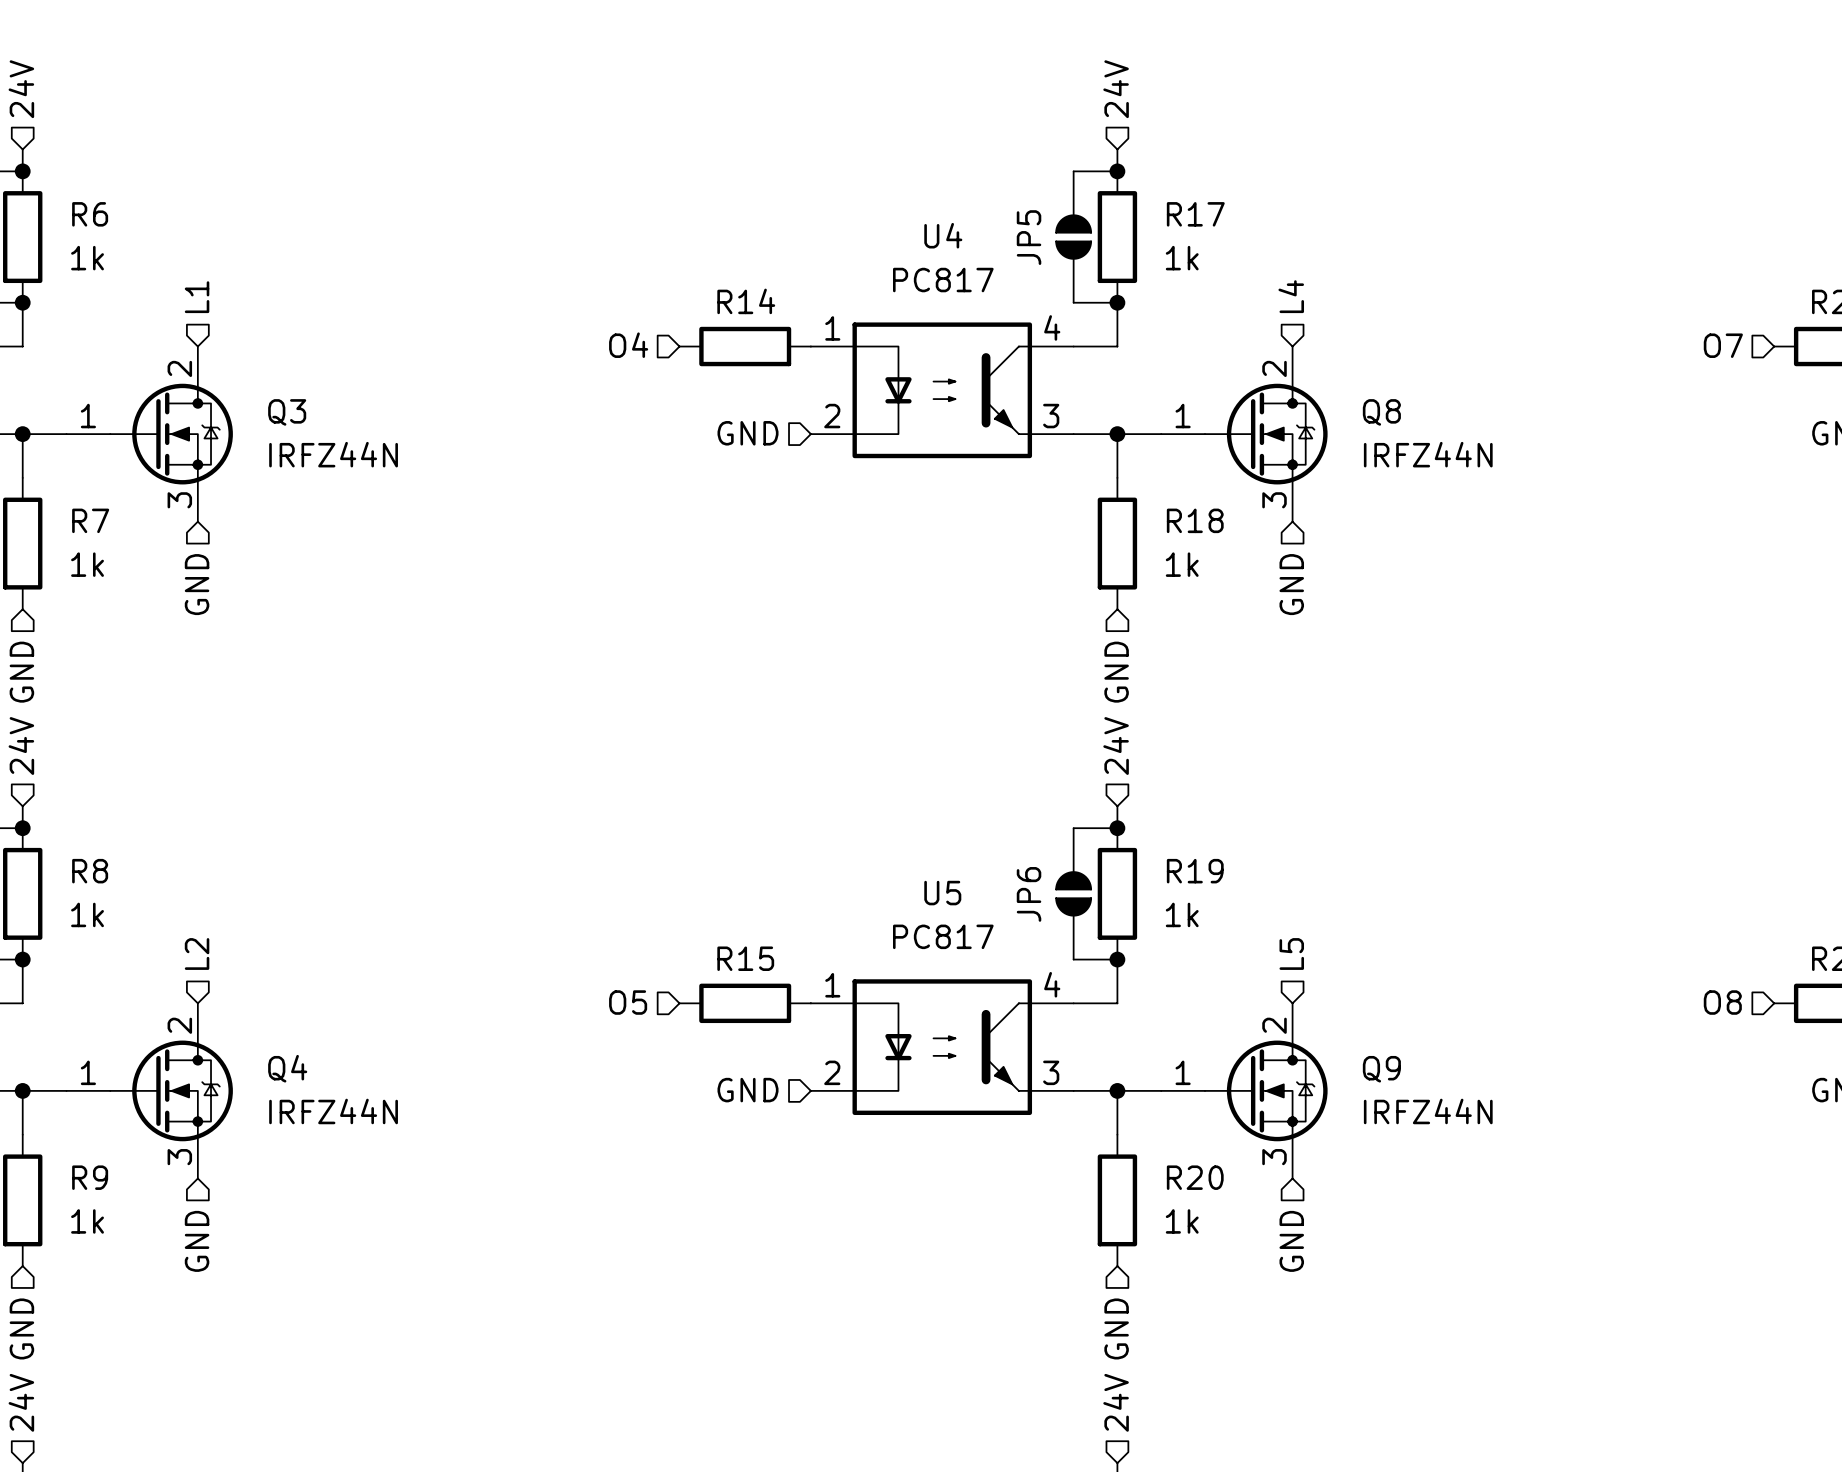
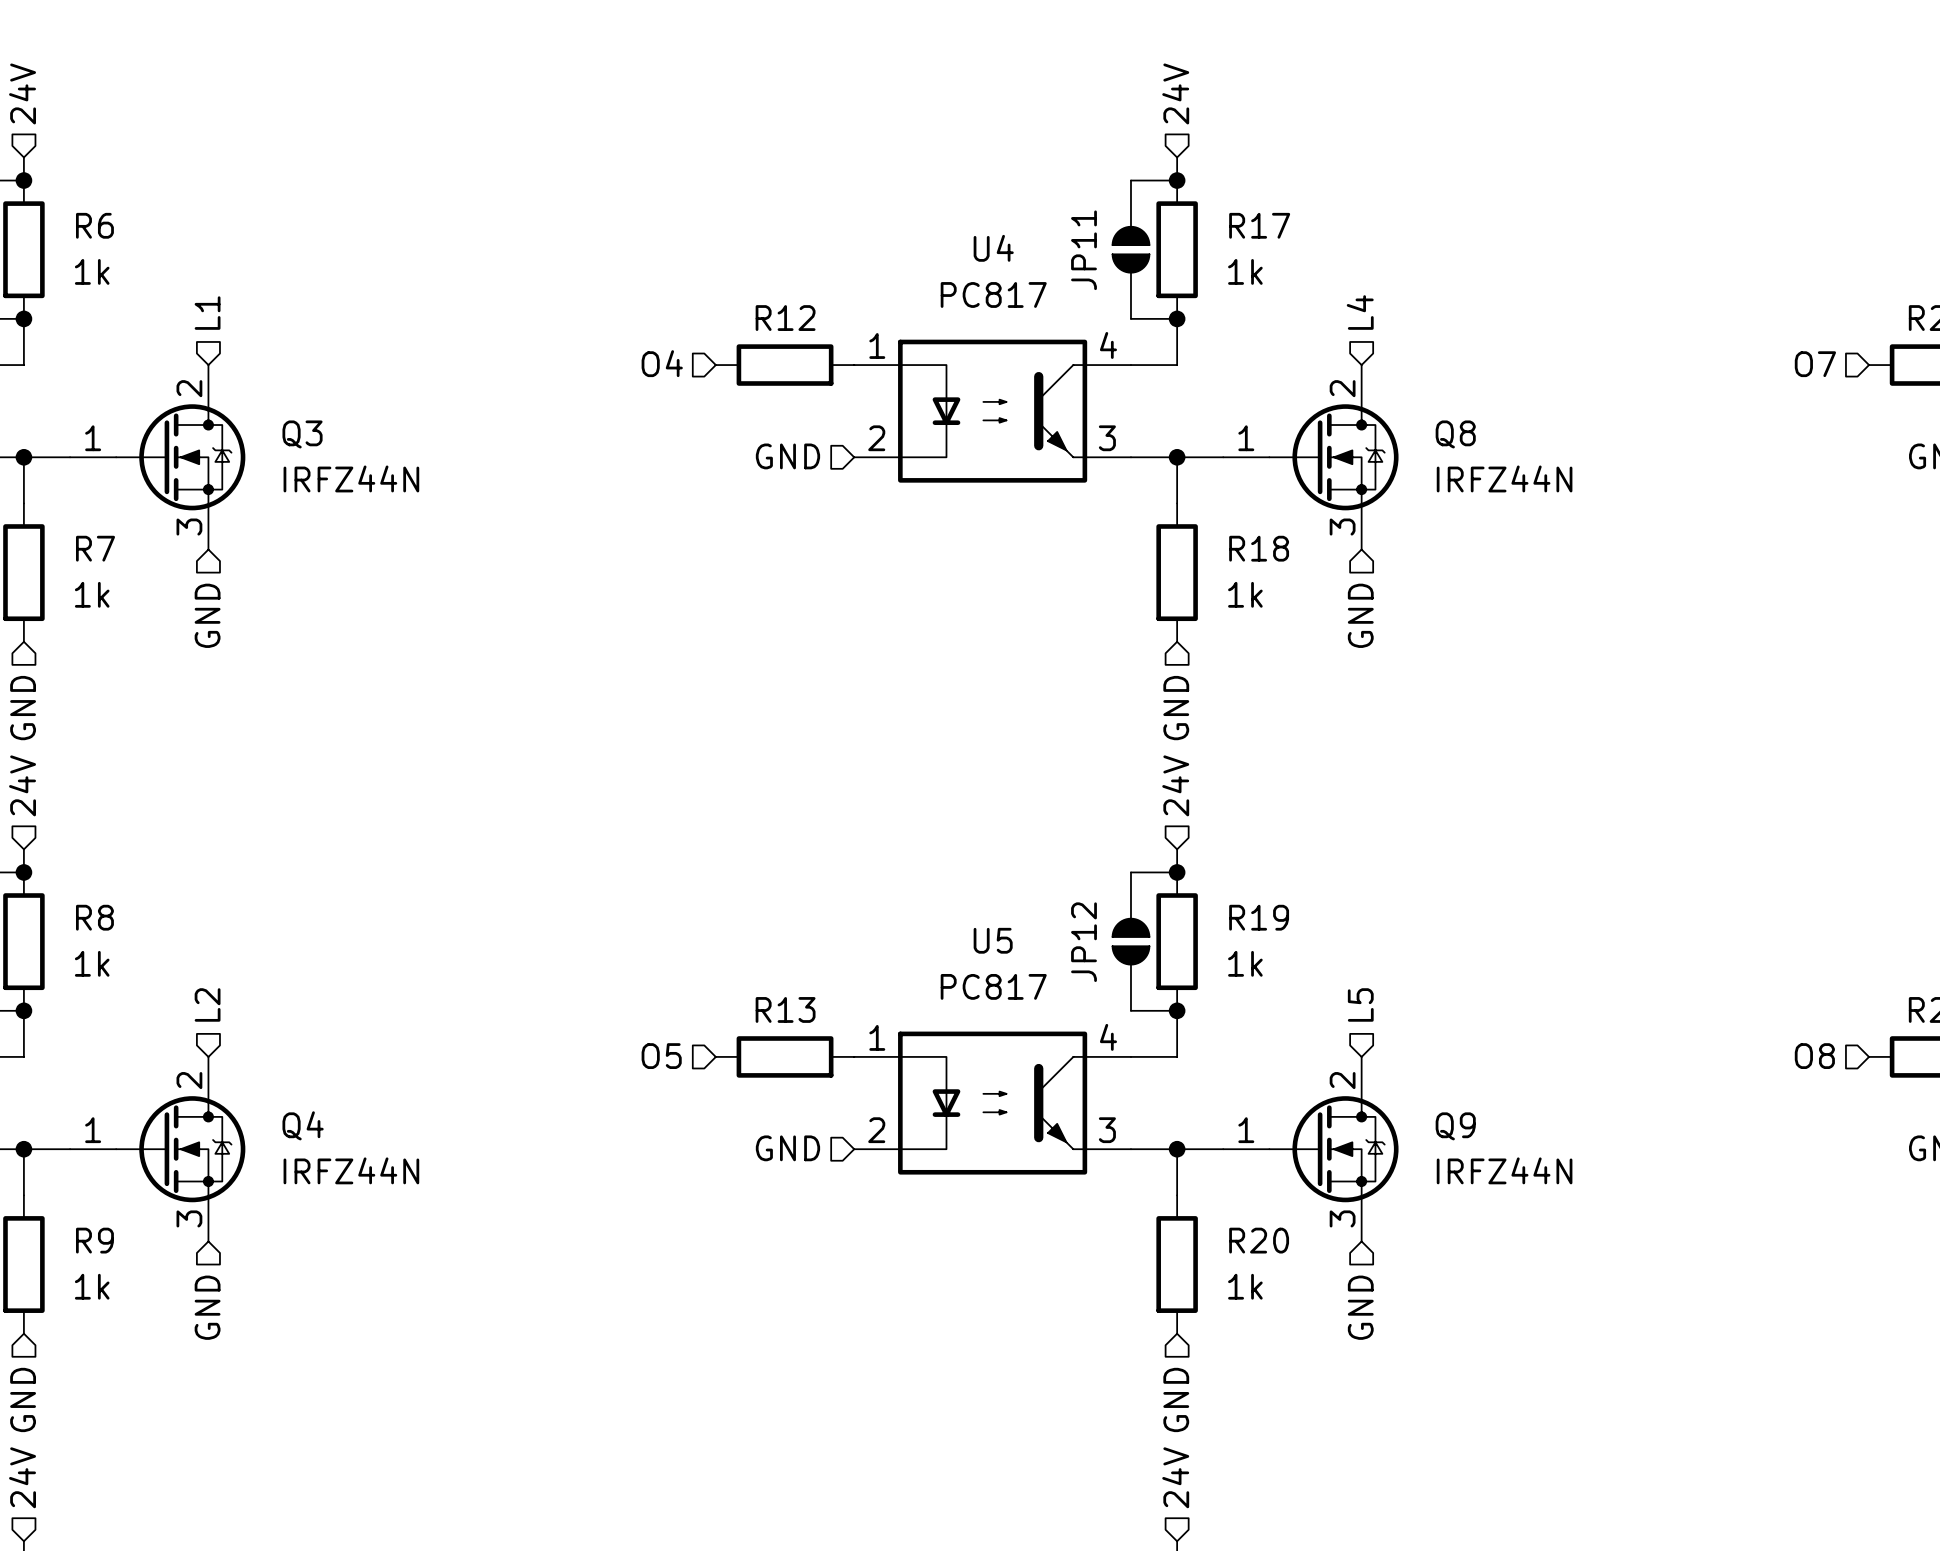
JP5 name: JP5 (1029, 237) -> JP11 (1084, 250)
R14 name: R14 (746, 301) -> R12 (785, 318)
JP6 name: JP6 (1029, 894) -> JP12 (1084, 942)
R15 name: R15 (745, 958) -> R13 (785, 1009)

